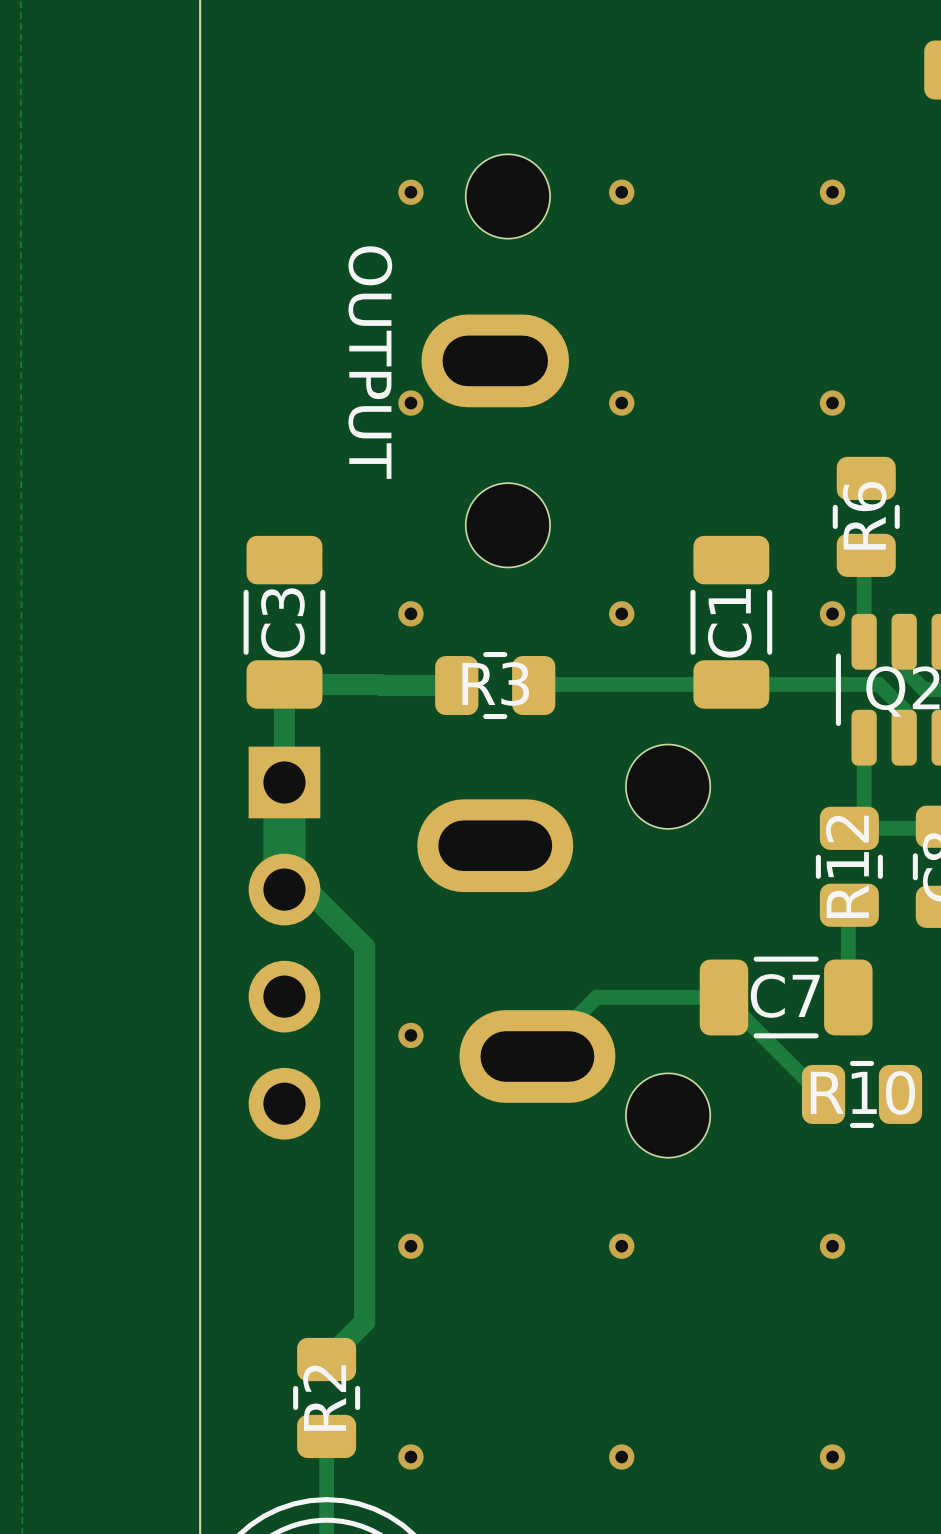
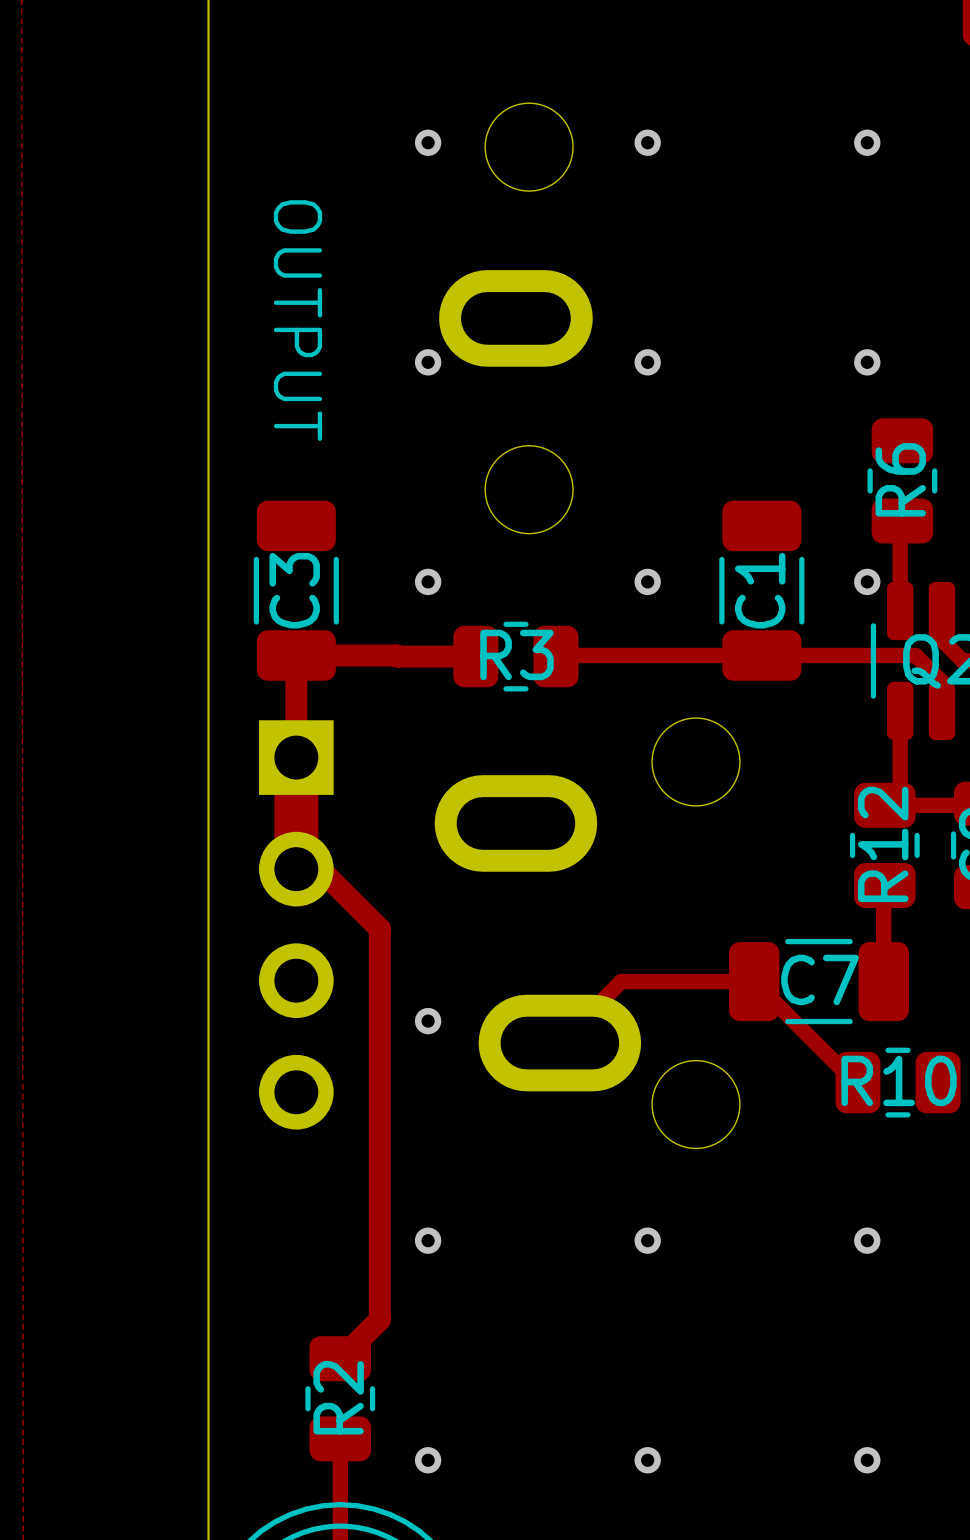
text position: OUTPUT (370, 362) -> OUTPUT (297, 320)

